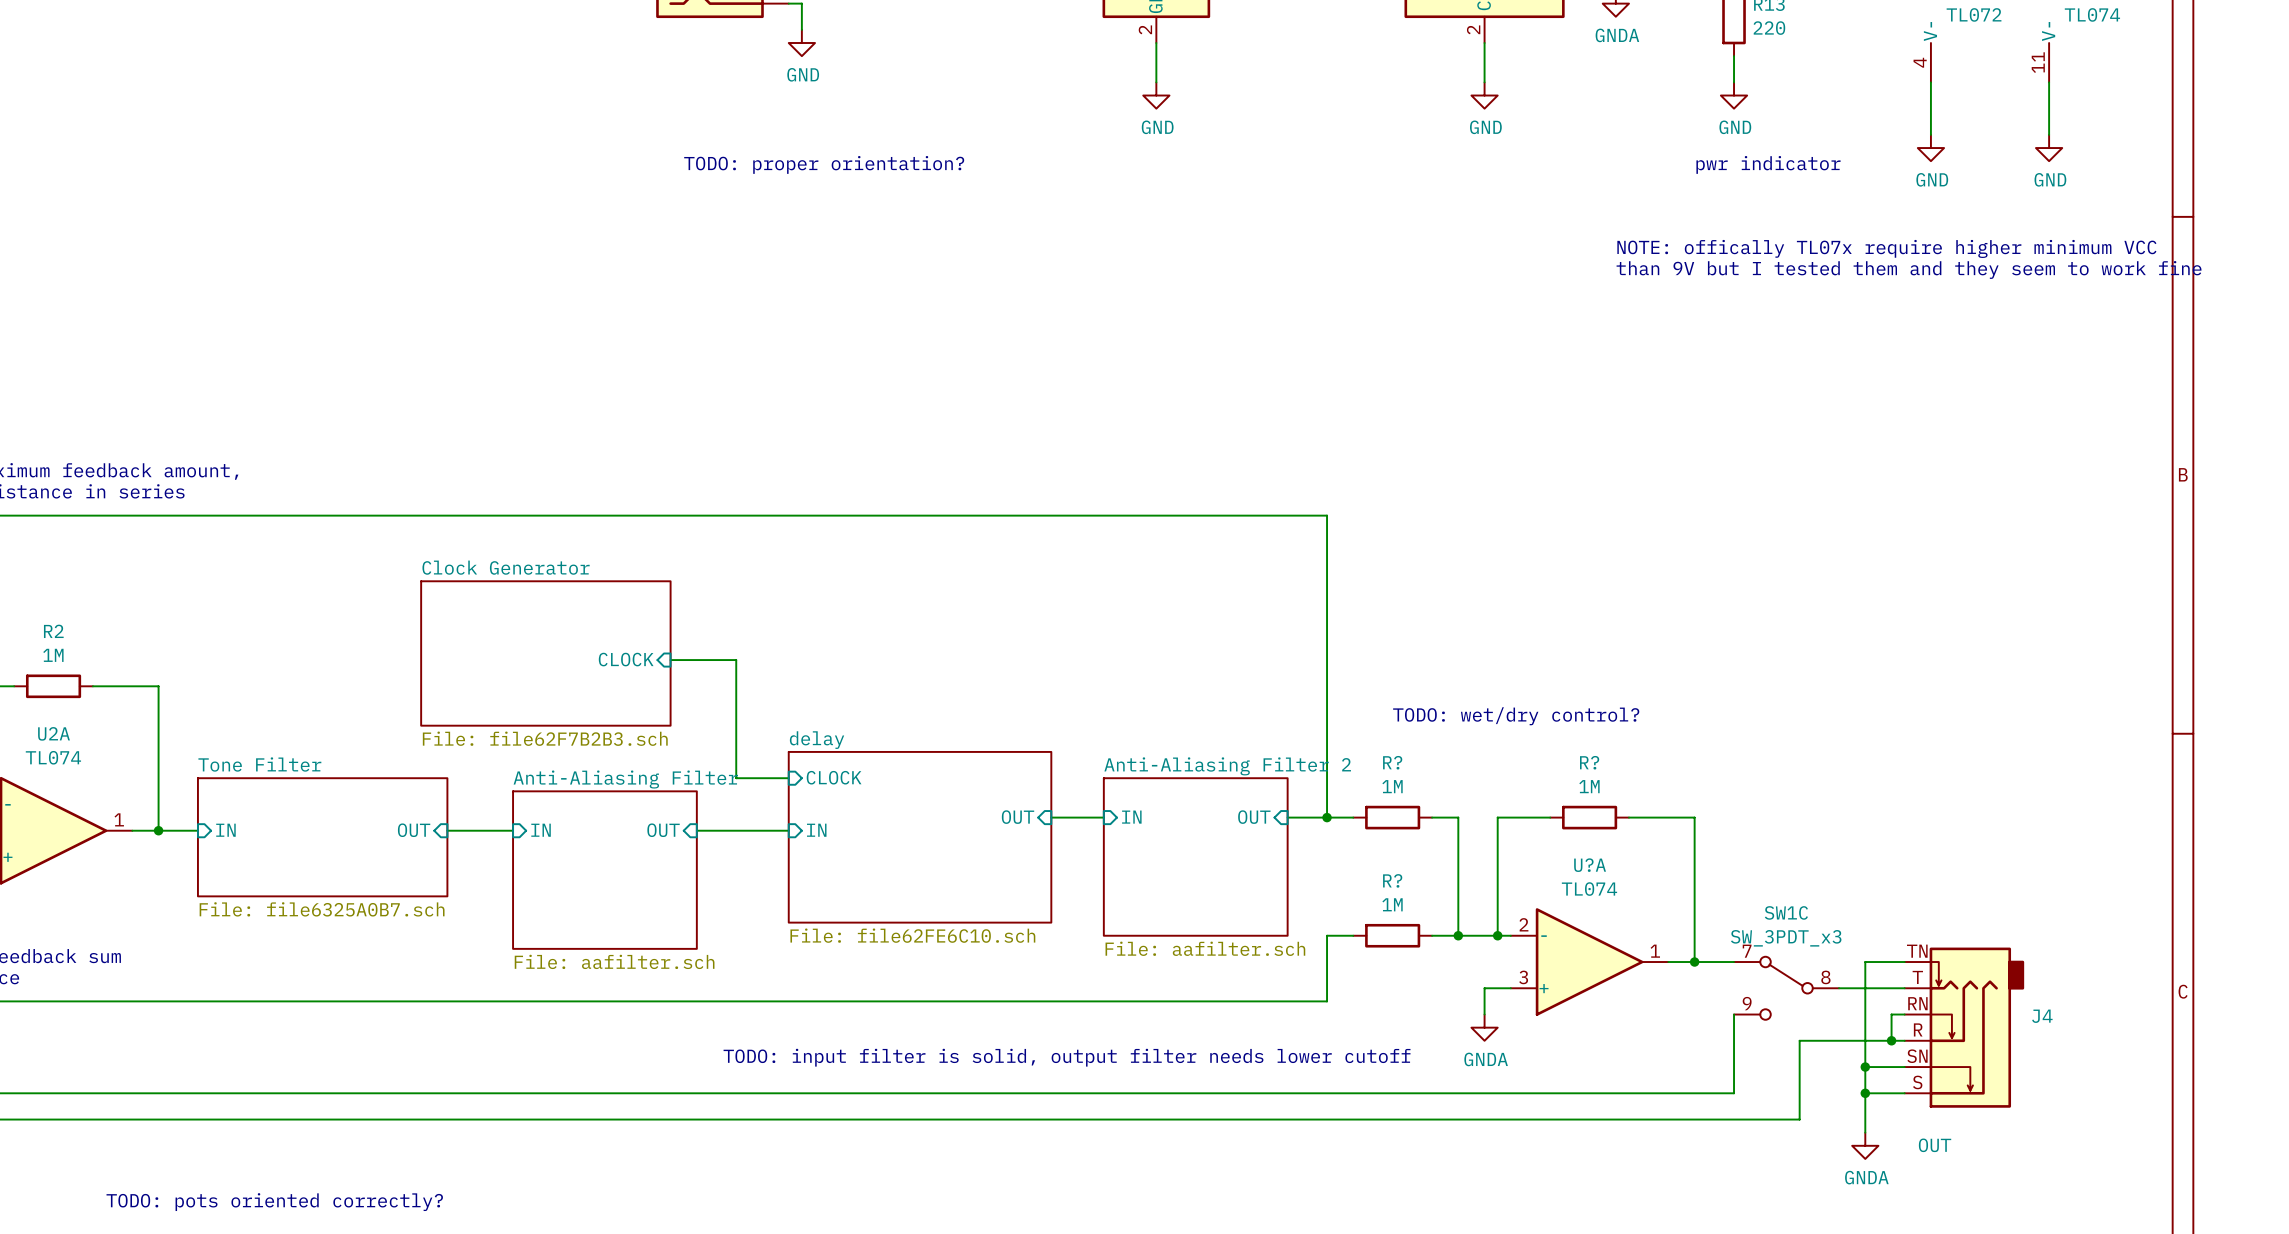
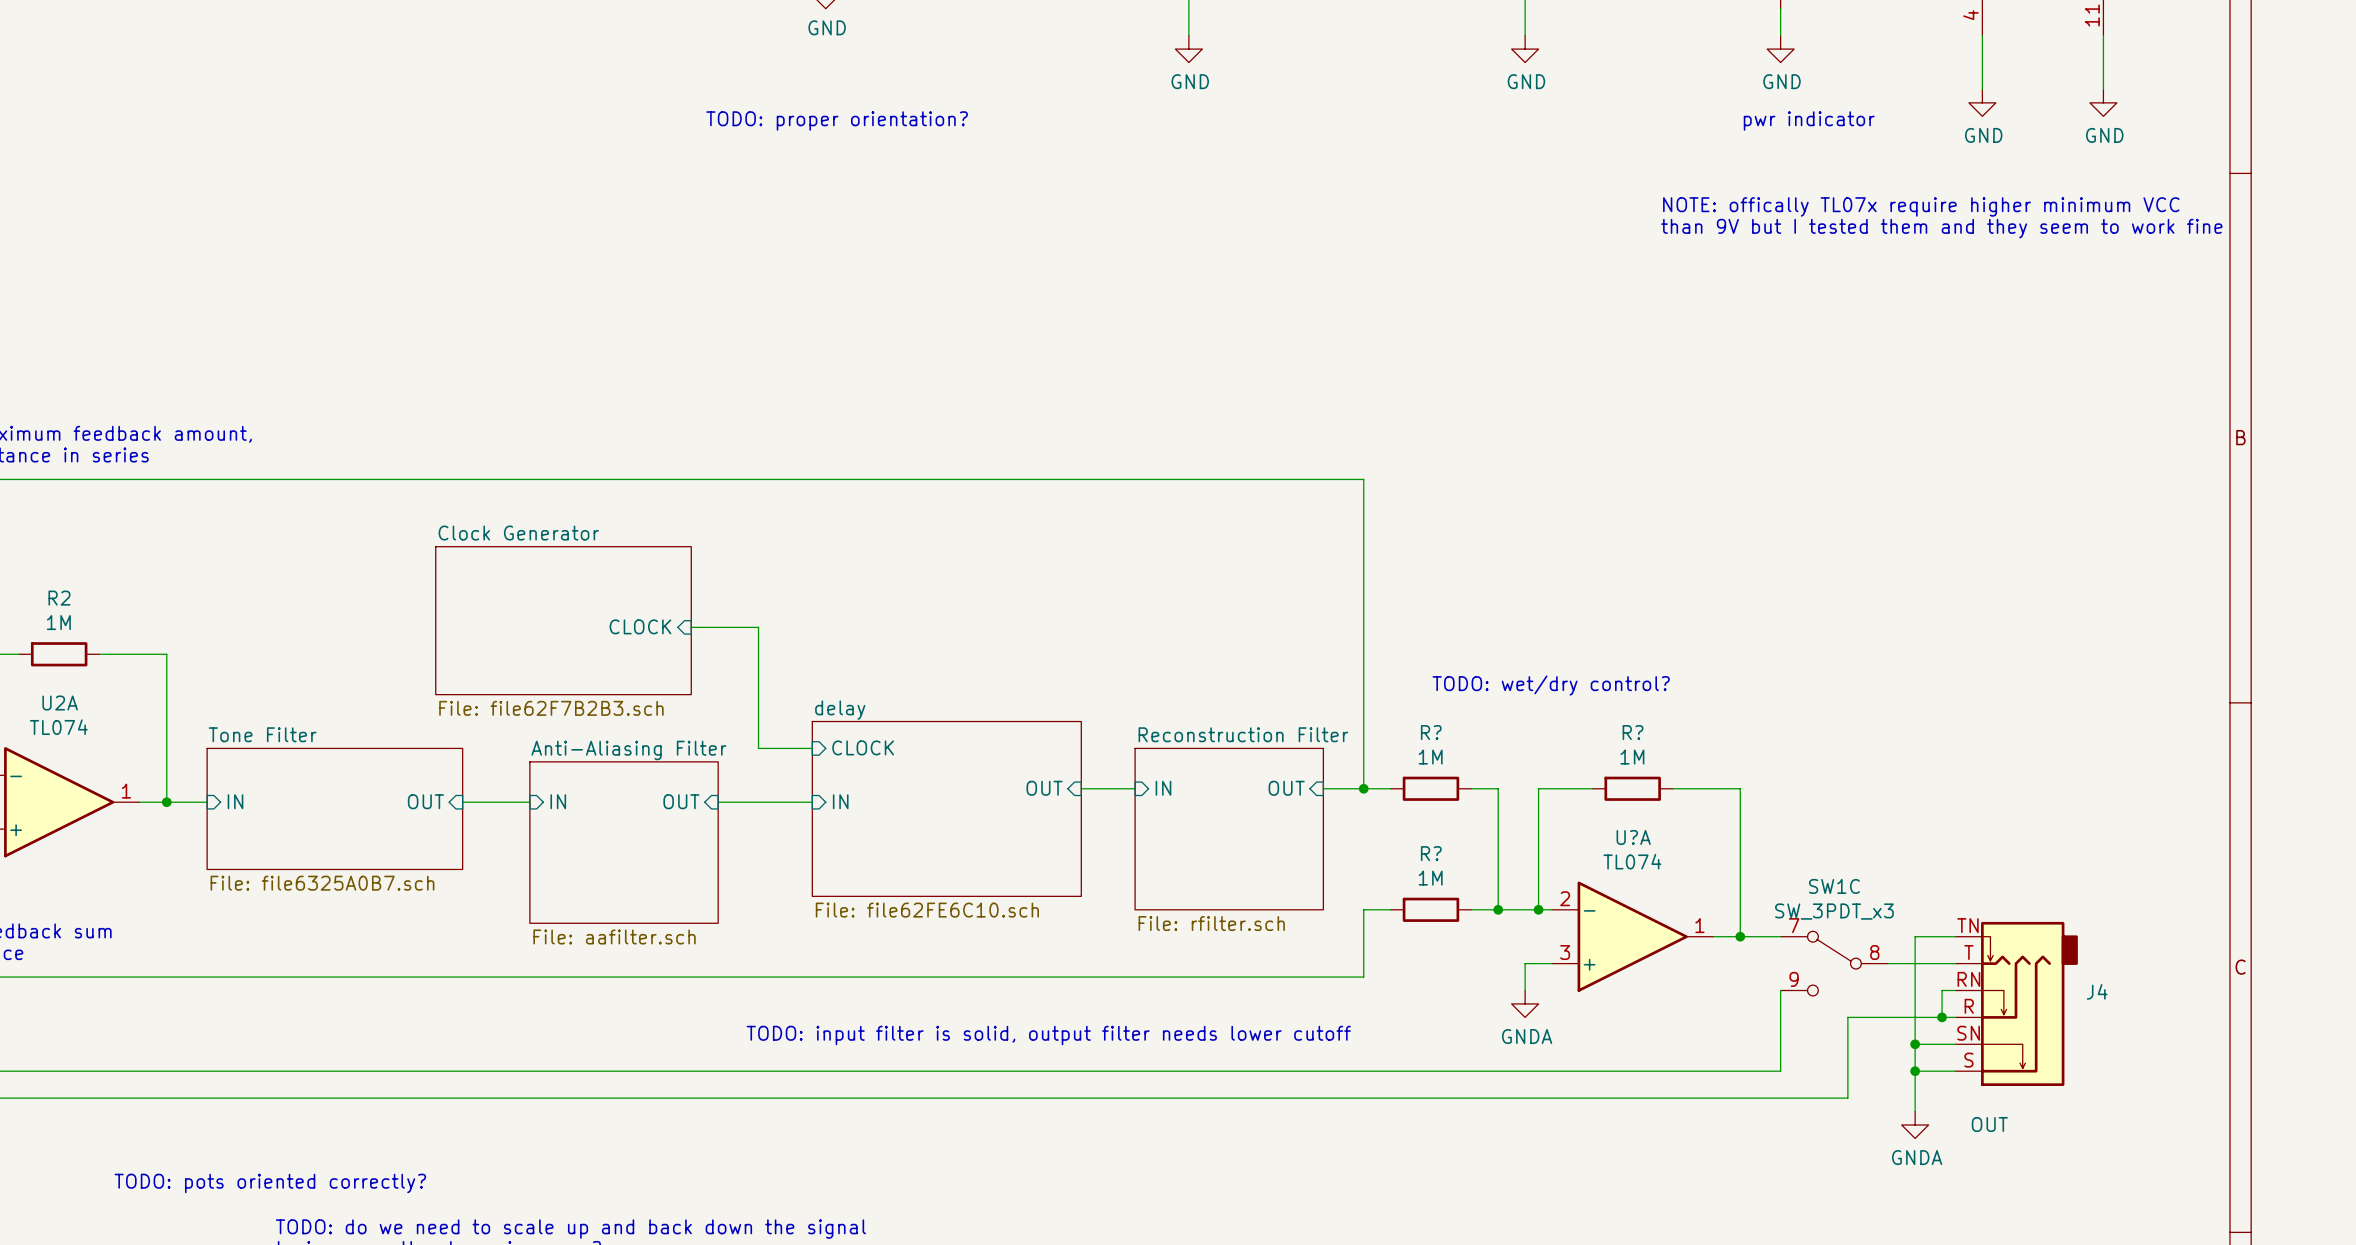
sheet Anti-Aliasing Filter 2 name: Anti-Aliasing Filter 2 (1227, 766) -> Reconstruction Filter (1243, 734)
sheet Anti-Aliasing Filter 2 value: File: aafilter.sch (1205, 948) -> File: rfilter.sch (1211, 923)

